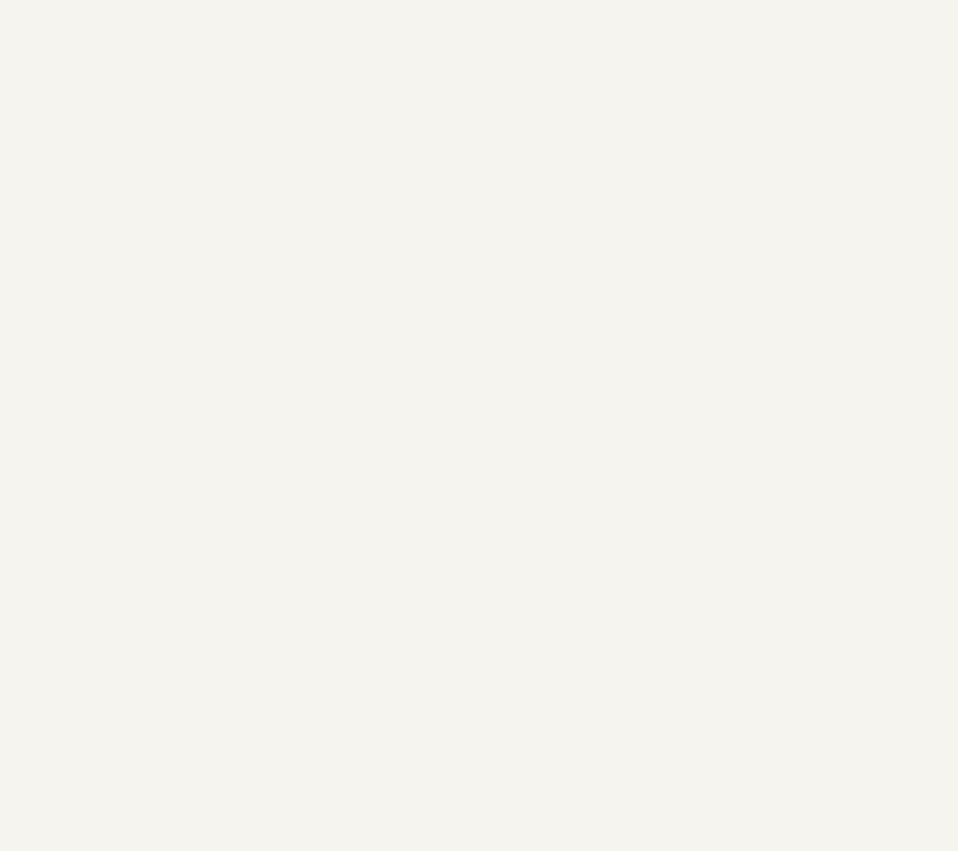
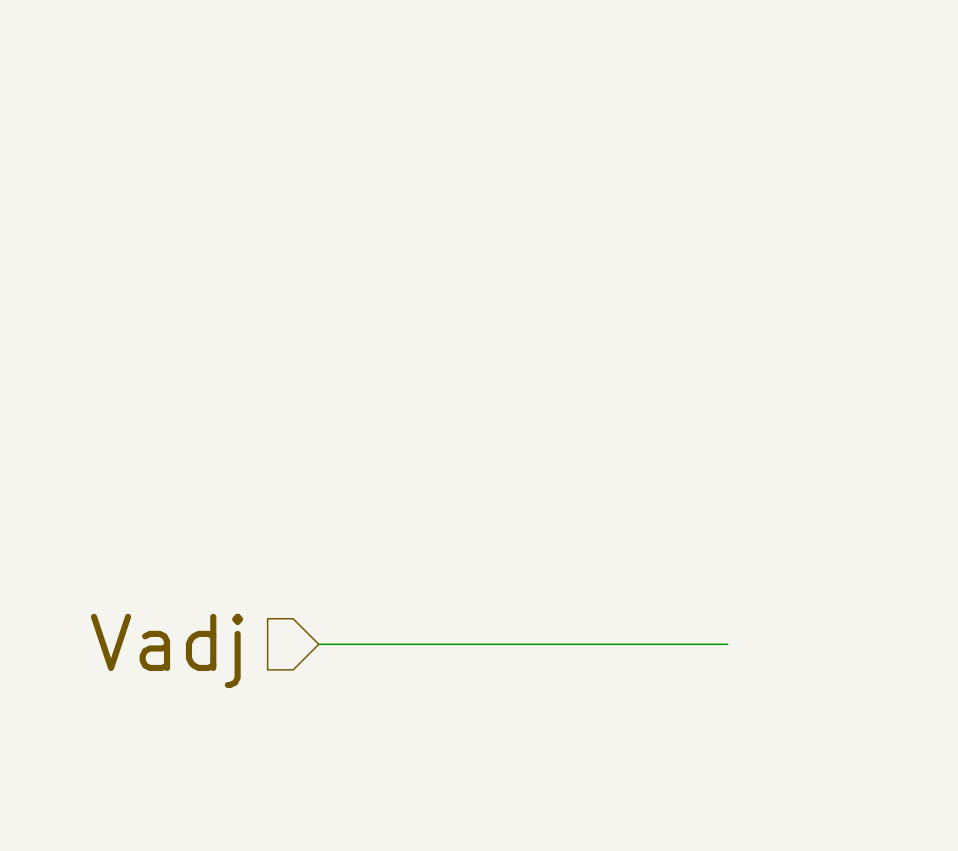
wire: none -> (318, 644) (727, 644)
hierarchical label: none -> Vadj (167, 650)

